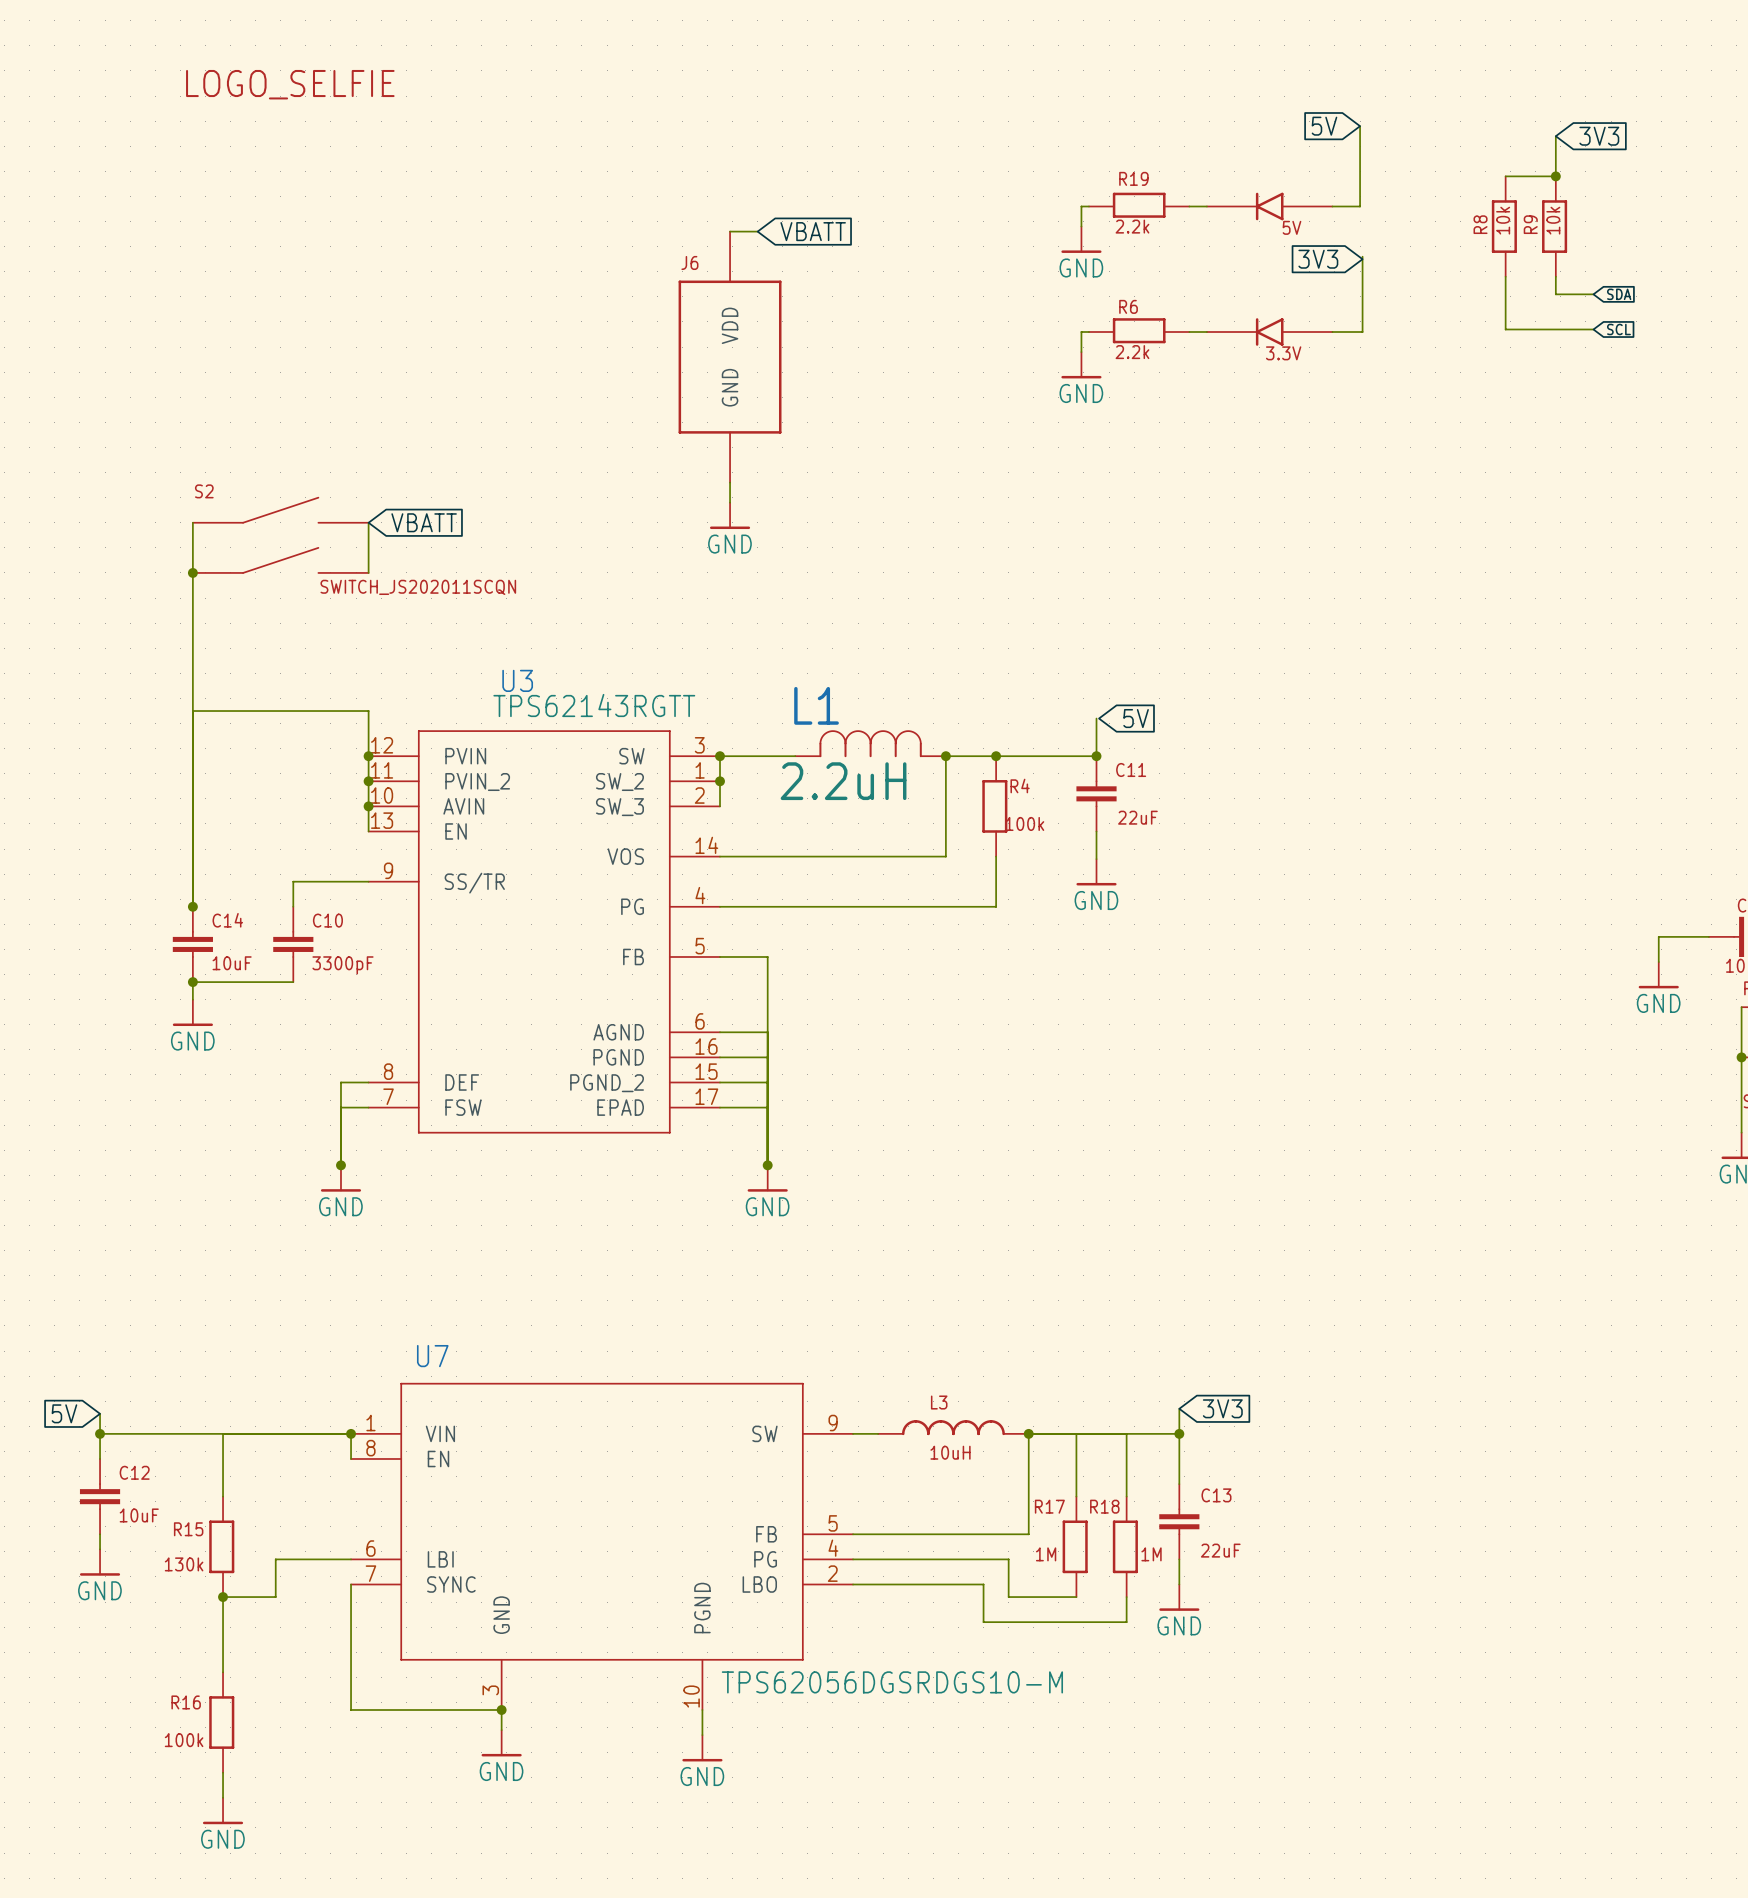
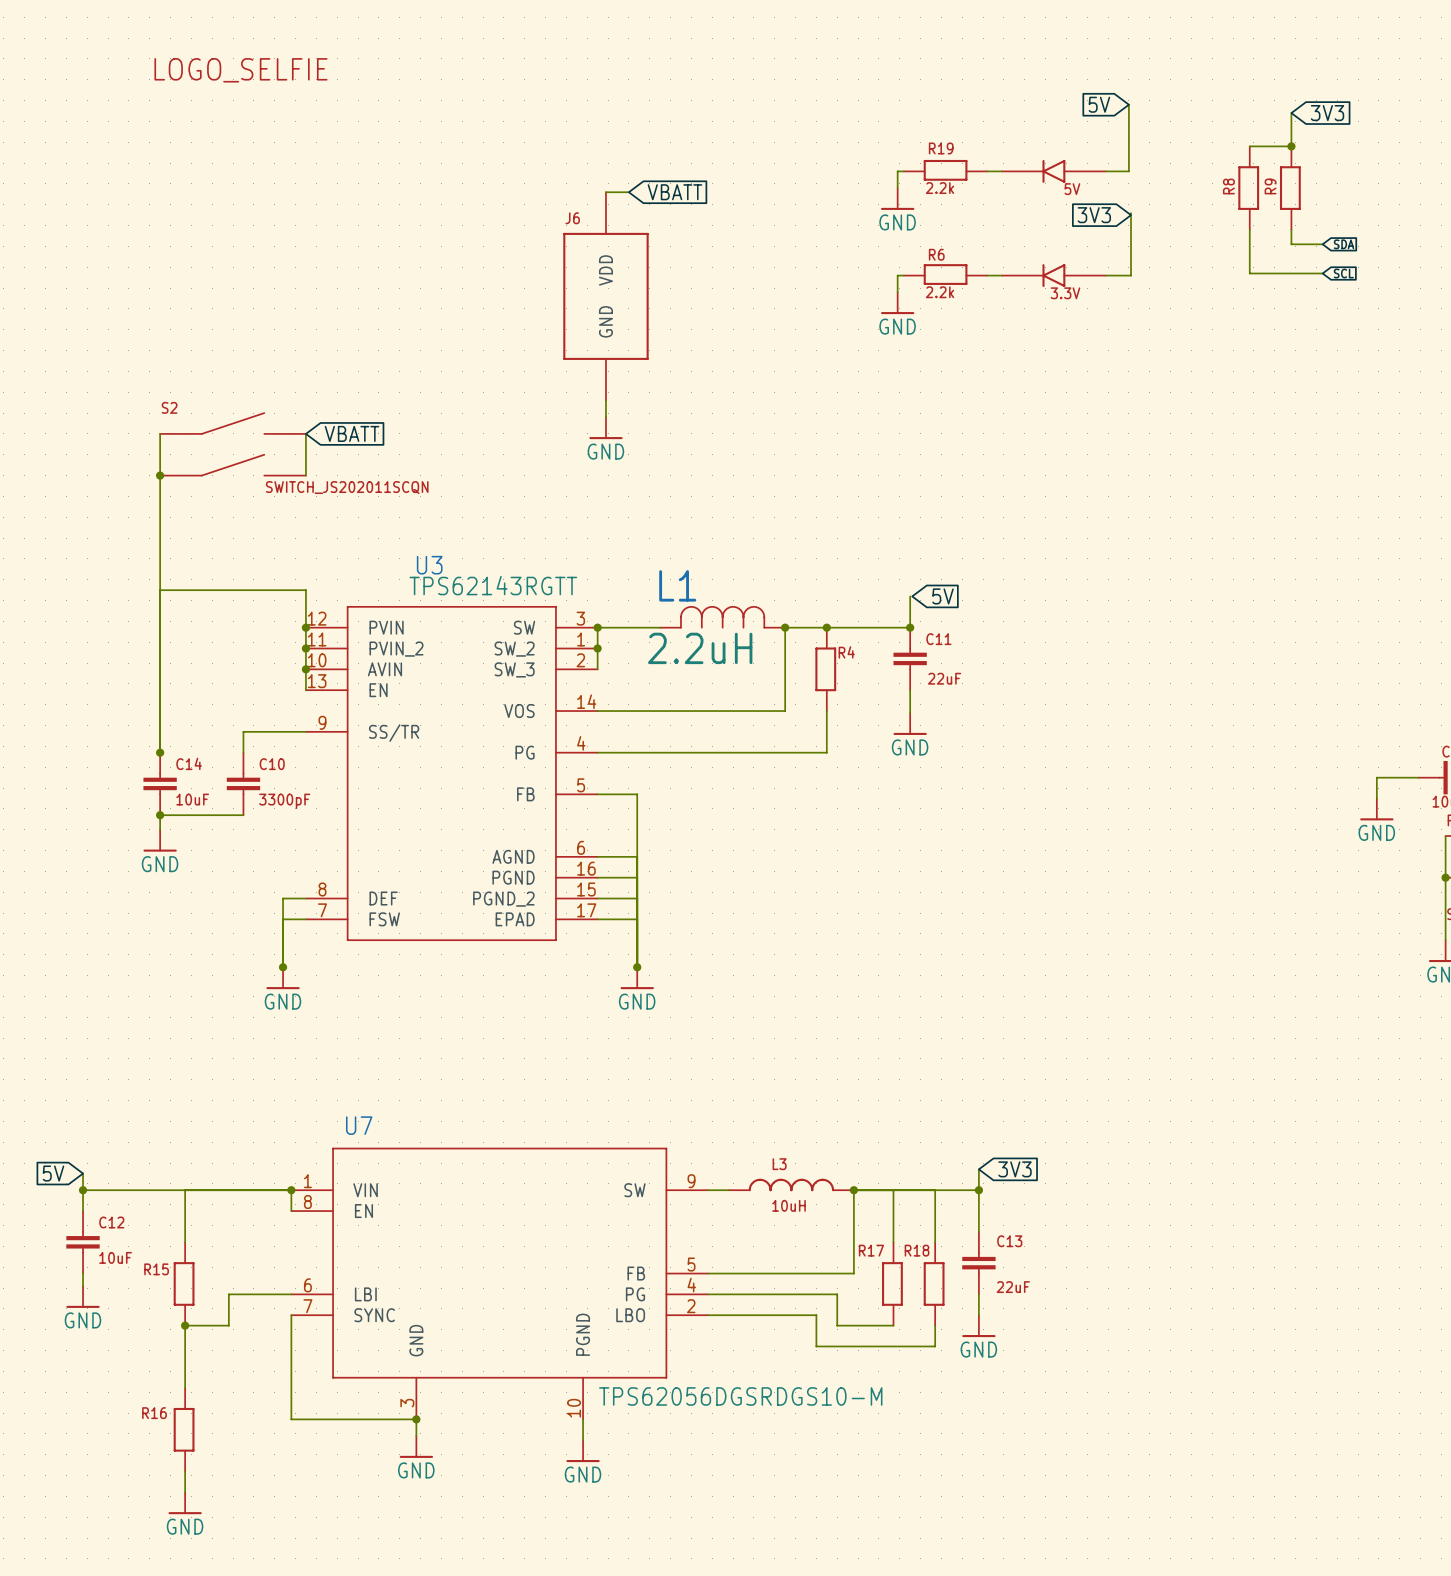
R8 value: 10k (1503, 220) -> none
R9 value: 10k (1553, 220) -> none
R4 value: 100k (1024, 823) -> none
R17 value: 1M (1046, 1554) -> none
R18 value: 1M (1151, 1554) -> none
R15 value: 130k (184, 1564) -> none
R16 value: 100k (184, 1740) -> none

